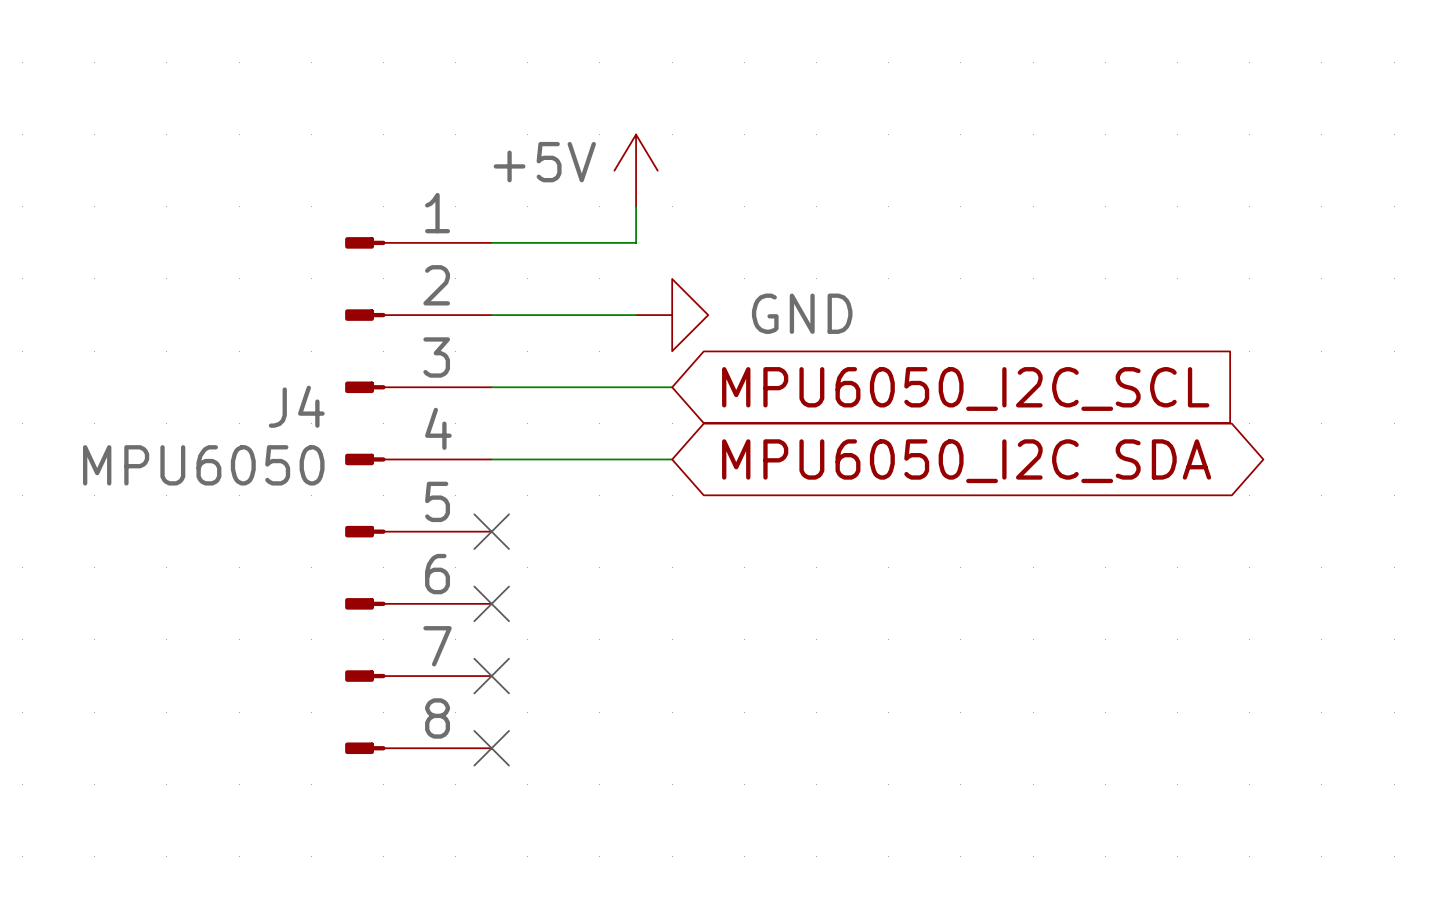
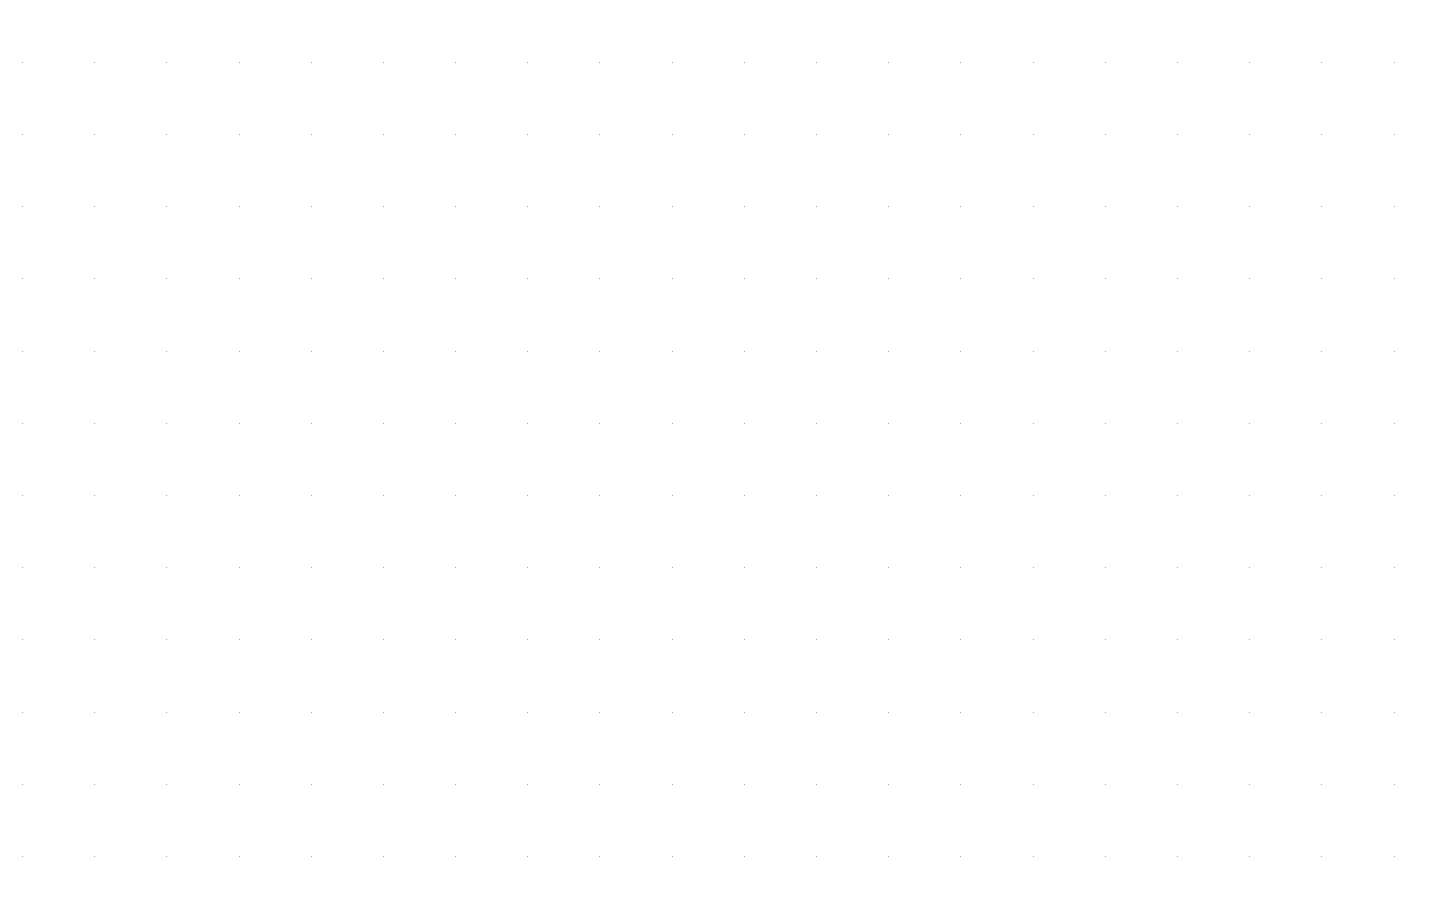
power symbol: +5V (636, 170) -> none
wire: (636, 206) (636, 242) (491, 242) -> none
wire: (491, 315) (636, 315) -> none
power symbol: GND (672, 315) -> none
wire: (491, 387) (672, 387) -> none
global label: MPU6050_I2C_SCL (965, 389) -> none
wire: (491, 459) (672, 459) -> none
global label: MPU6050_I2C_SDA (966, 461) -> none
J4: MPU6050 (418, 495) -> none
no-connect mark: (491, 531) -> none
no-connect mark: (491, 603) -> none
no-connect mark: (491, 676) -> none
no-connect mark: (491, 748) -> none

